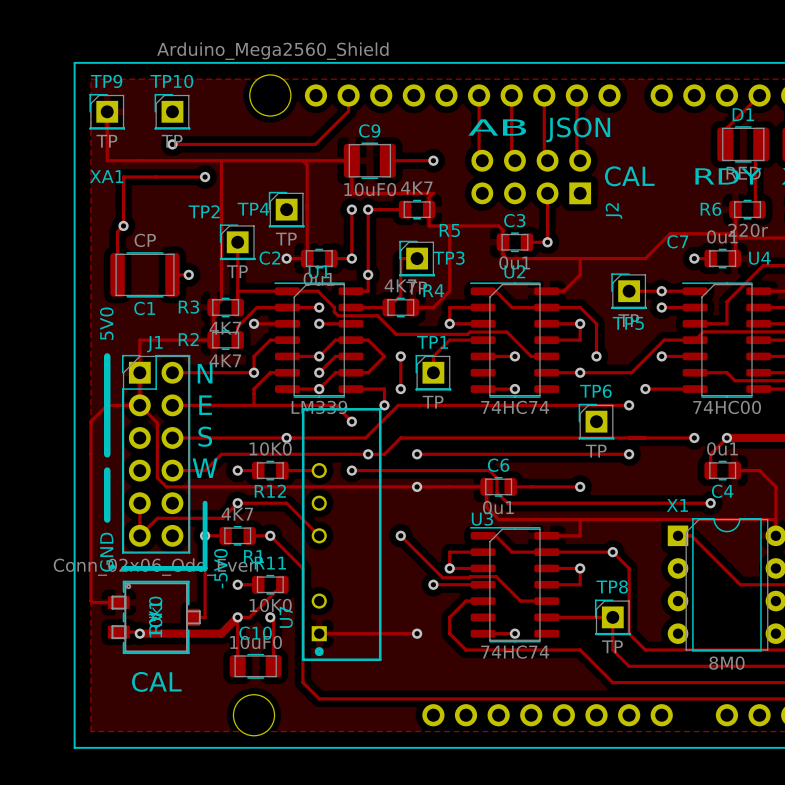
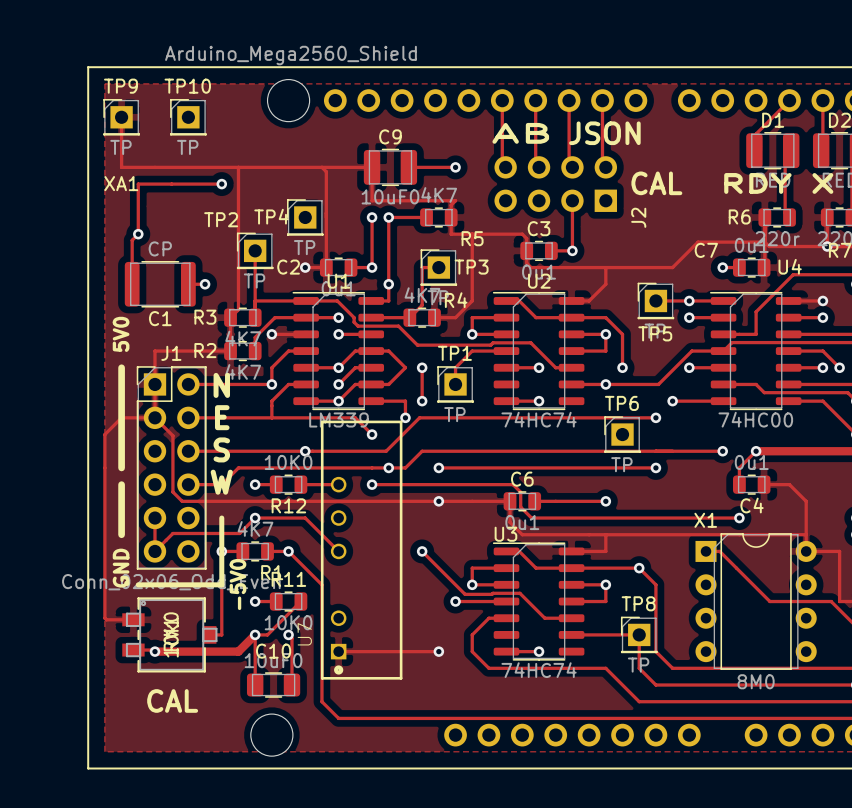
track: (348, 95) (348, 111) (315, 144) (172, 144) -> none
via: (172, 144) -> none

